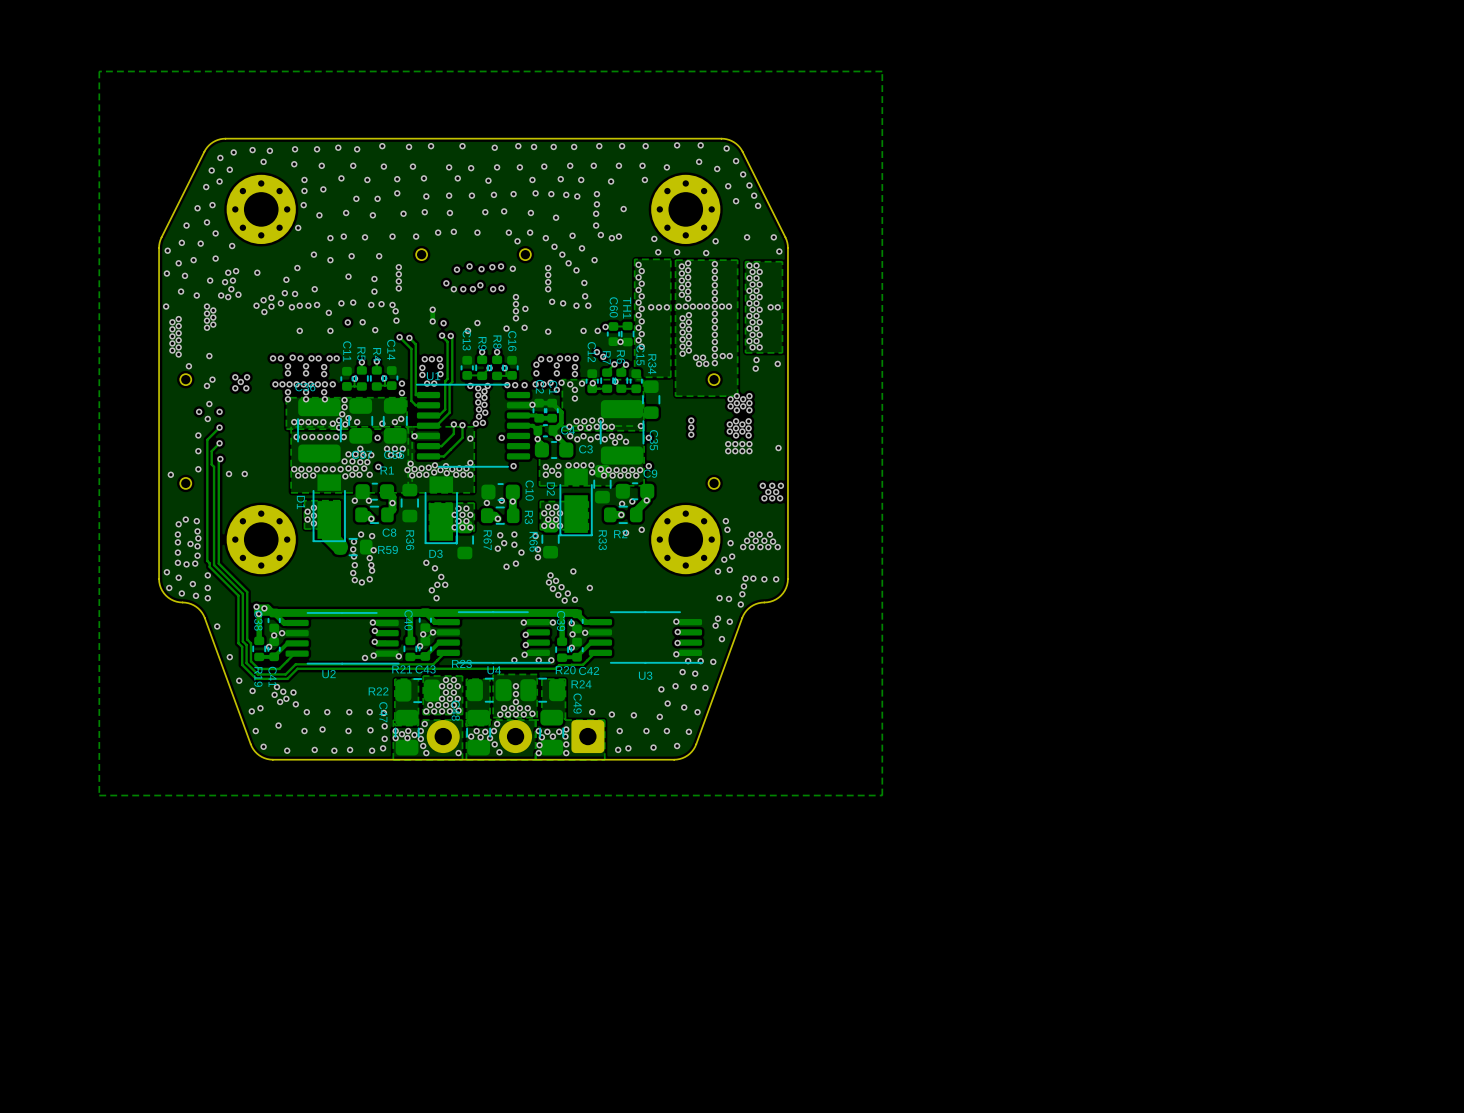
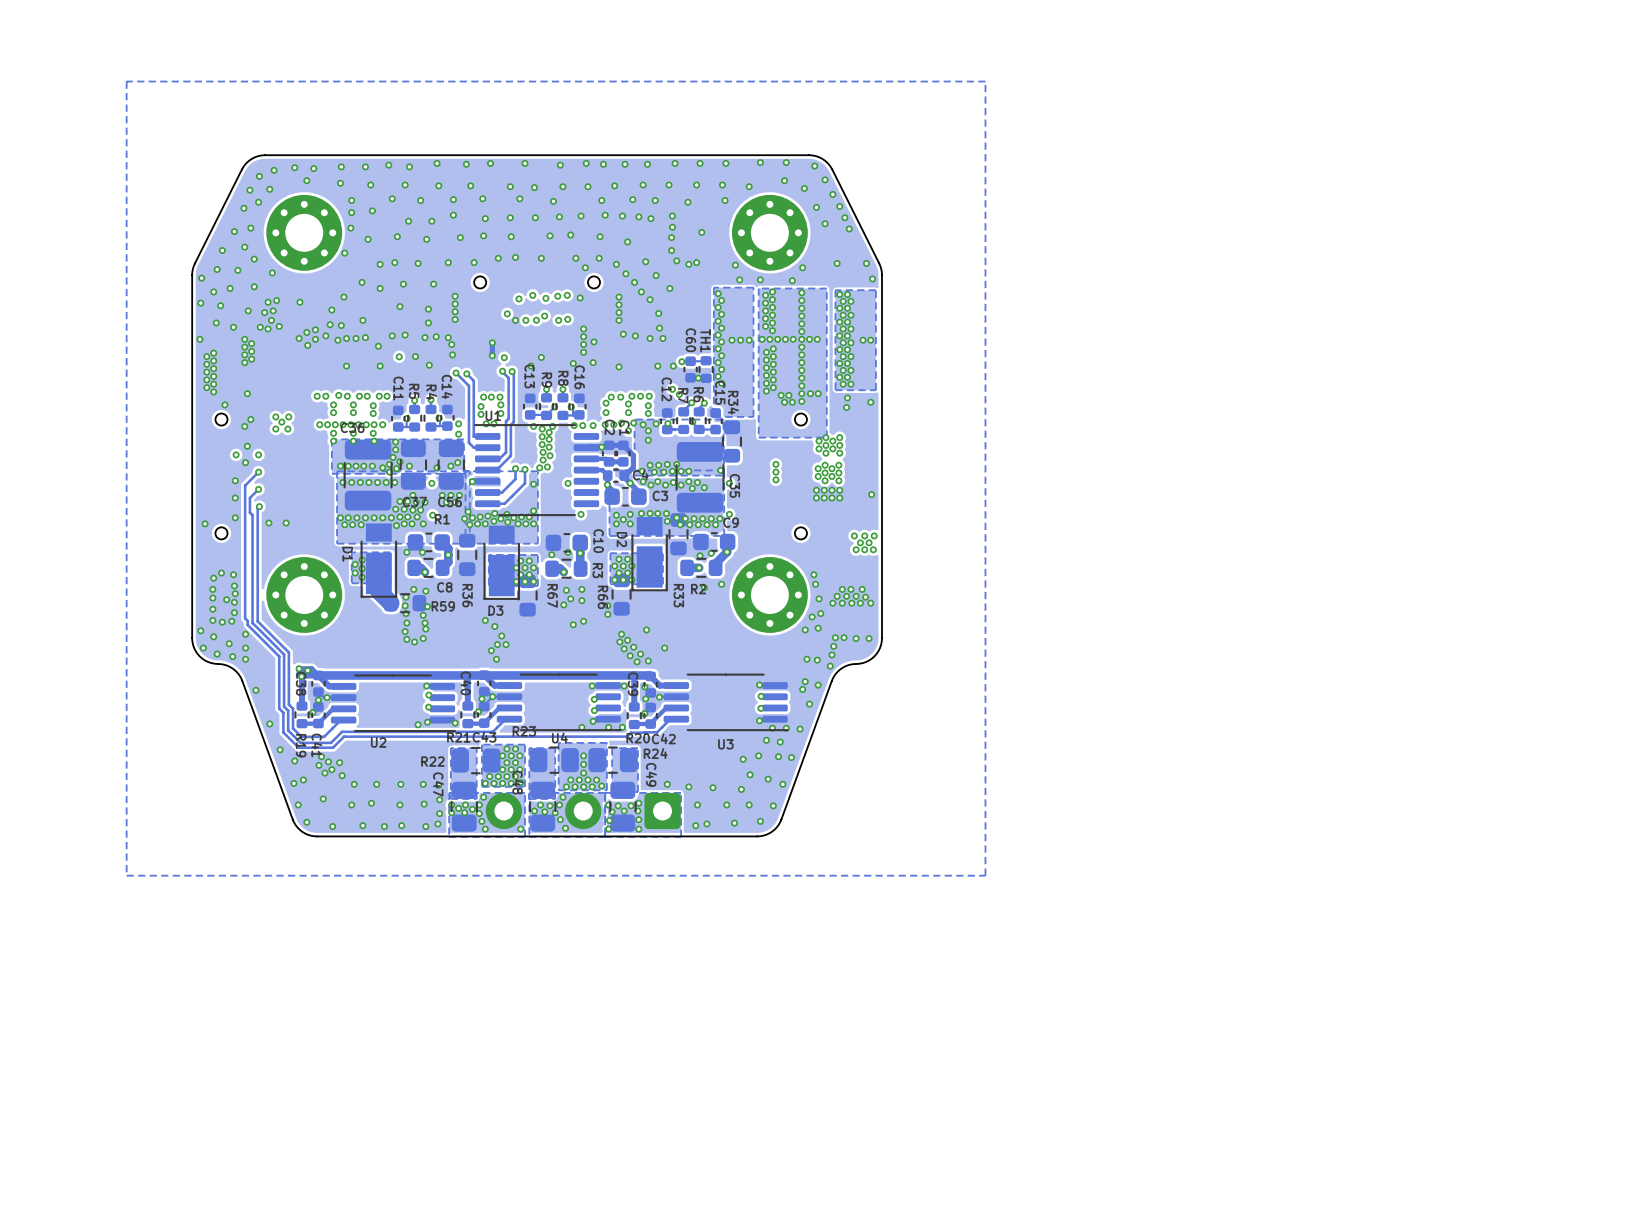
via: (535, 536) -> none
via: (521, 552) -> none

